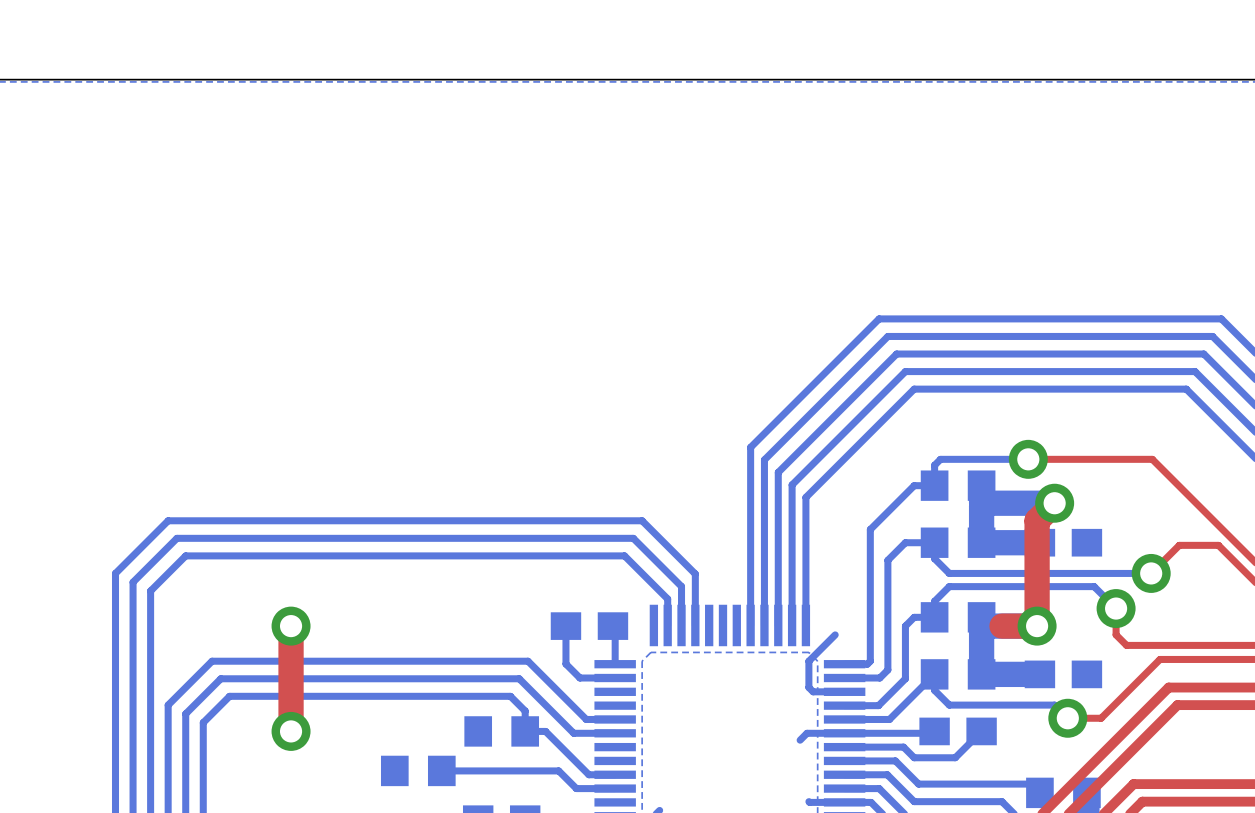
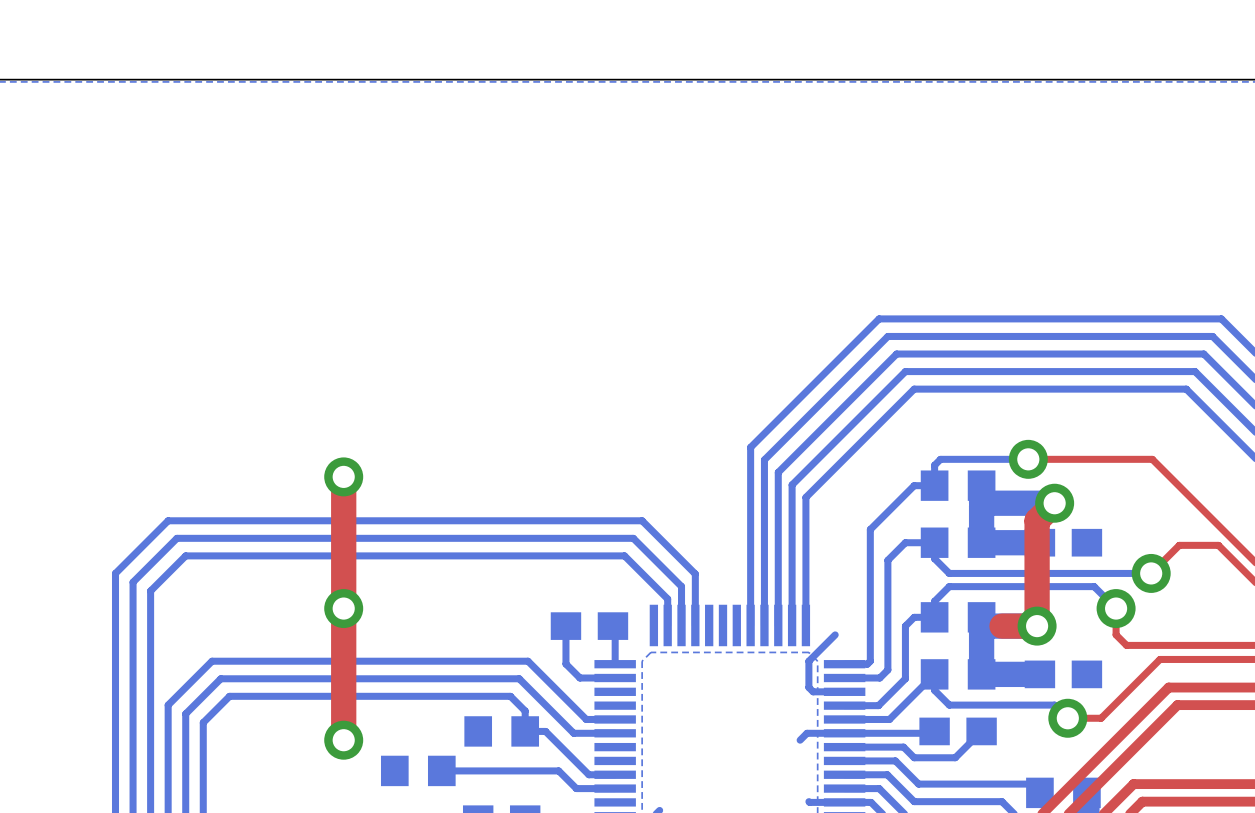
top track: none -> (343, 476) (343, 740)
via: none -> (343, 476)
top track: (291, 626) (291, 731) -> none
via position: (291, 626) -> (343, 608)
via position: (291, 731) -> (343, 740)

